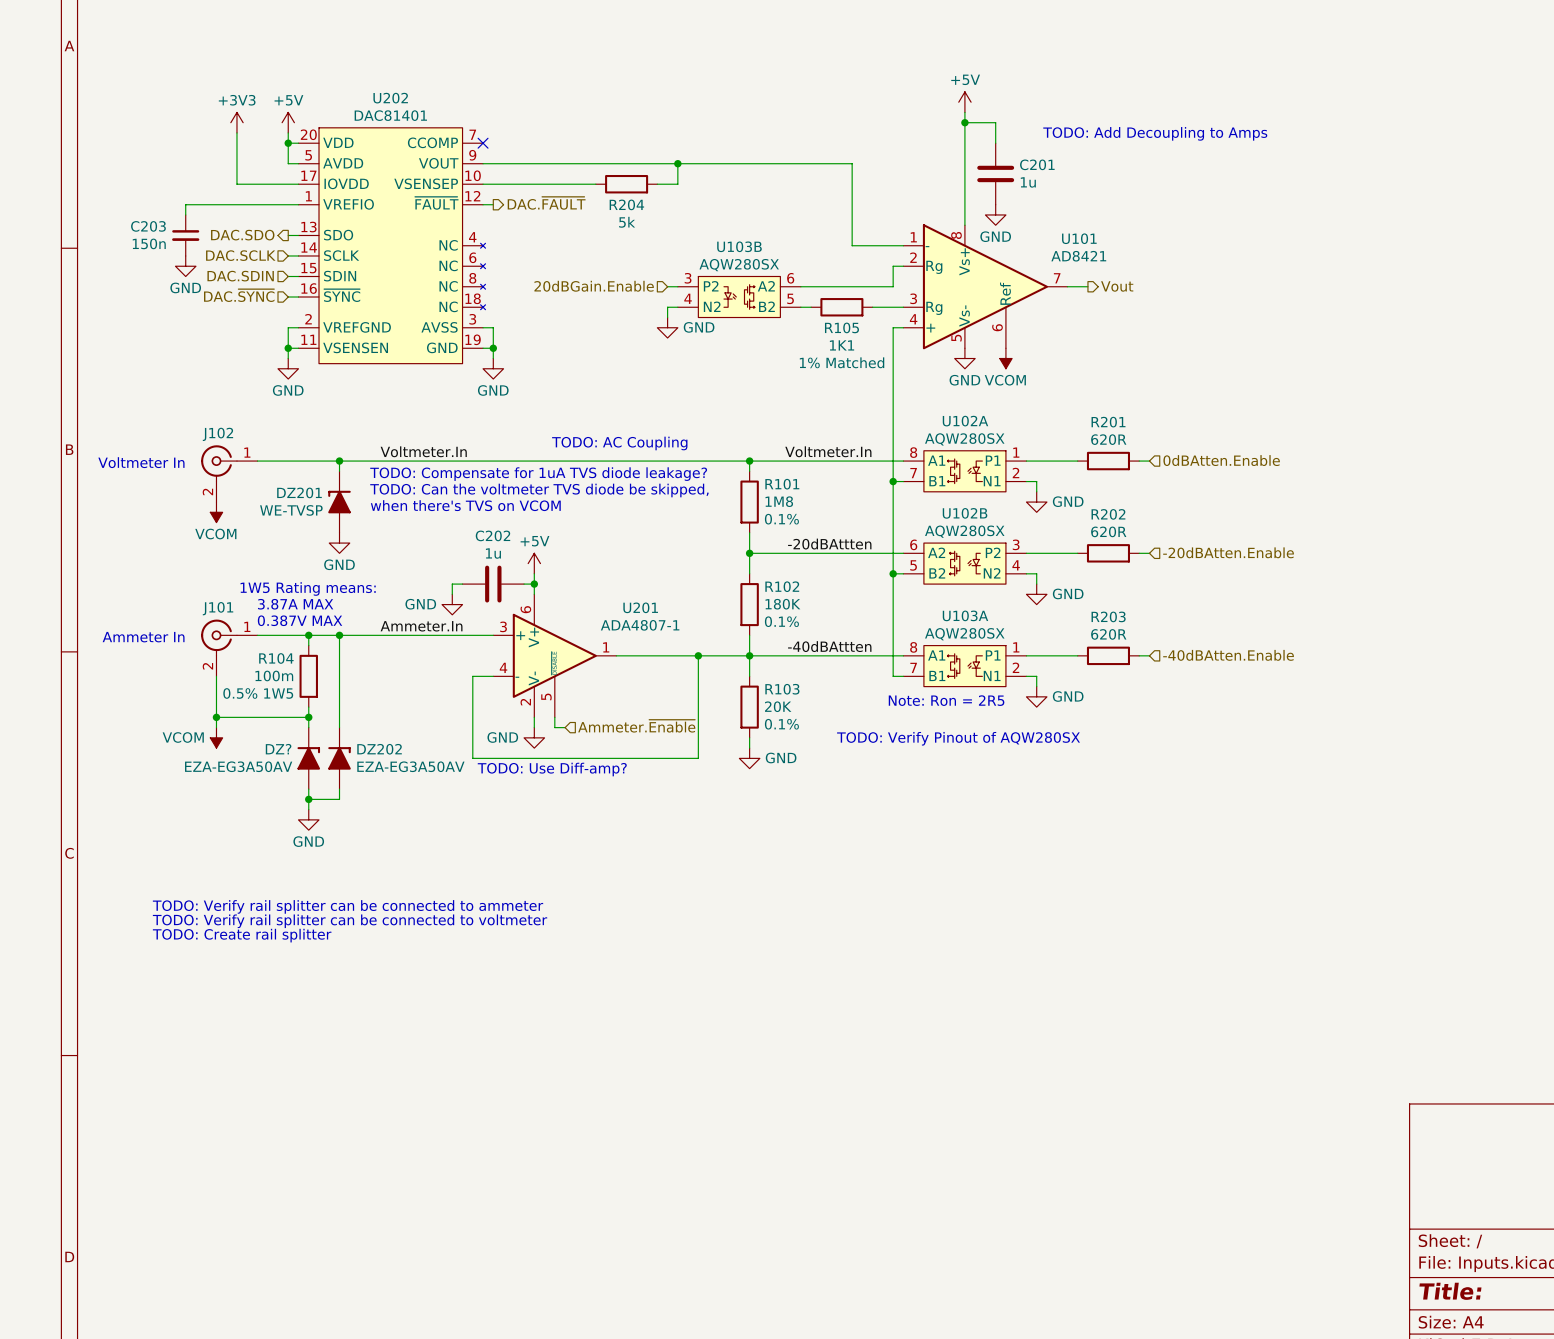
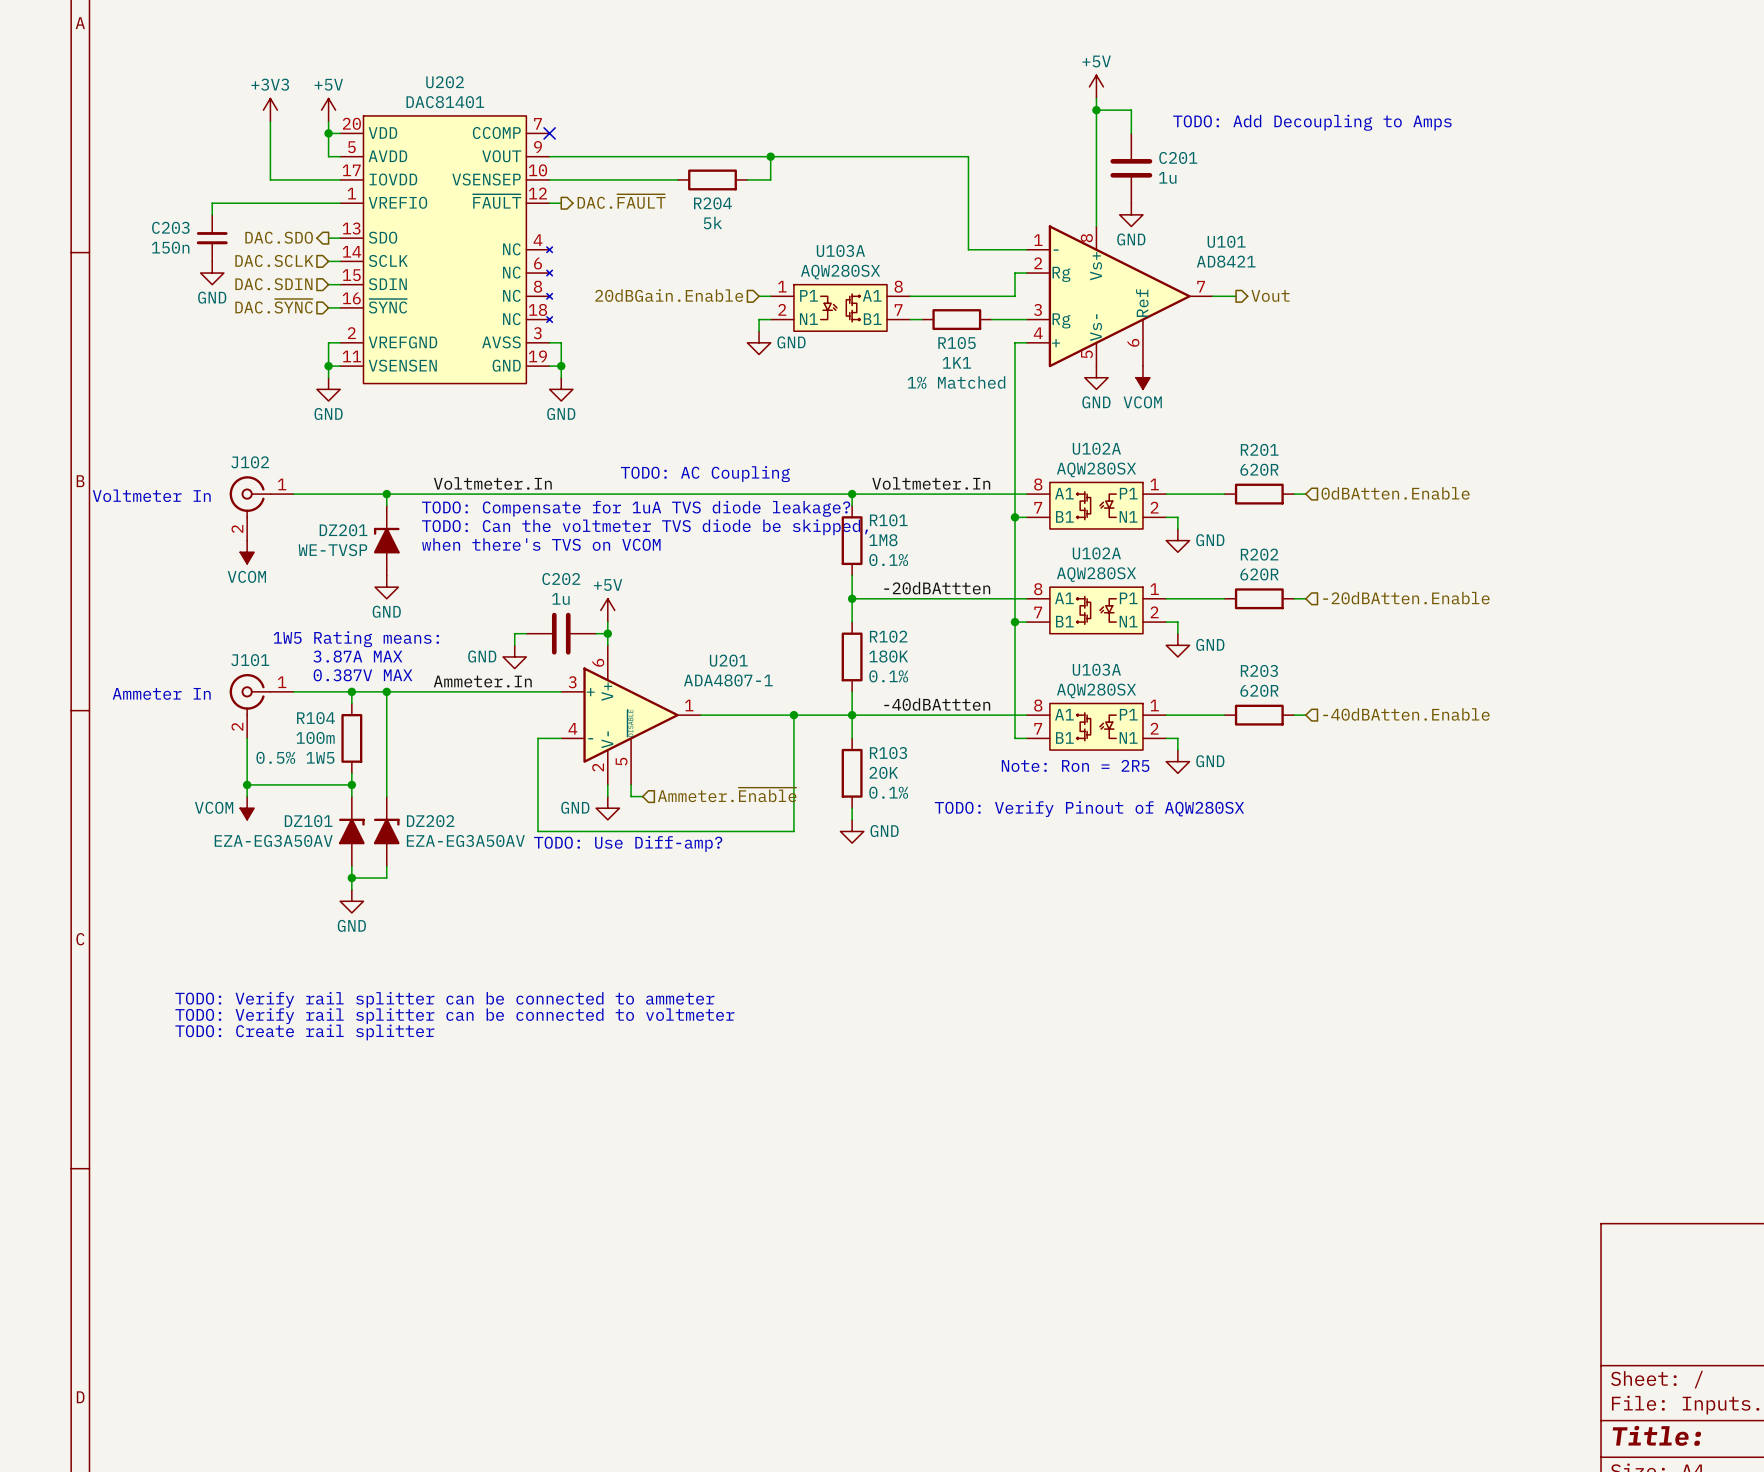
U103B: AQW280SX (739, 297) -> none
U103A: none -> AQW280SX (840, 307)
U102B: AQW280SX (964, 563) -> none
U102A: none -> AQW280SX (1096, 610)
DZ? name: DZ? (278, 749) -> DZ101 (308, 821)

